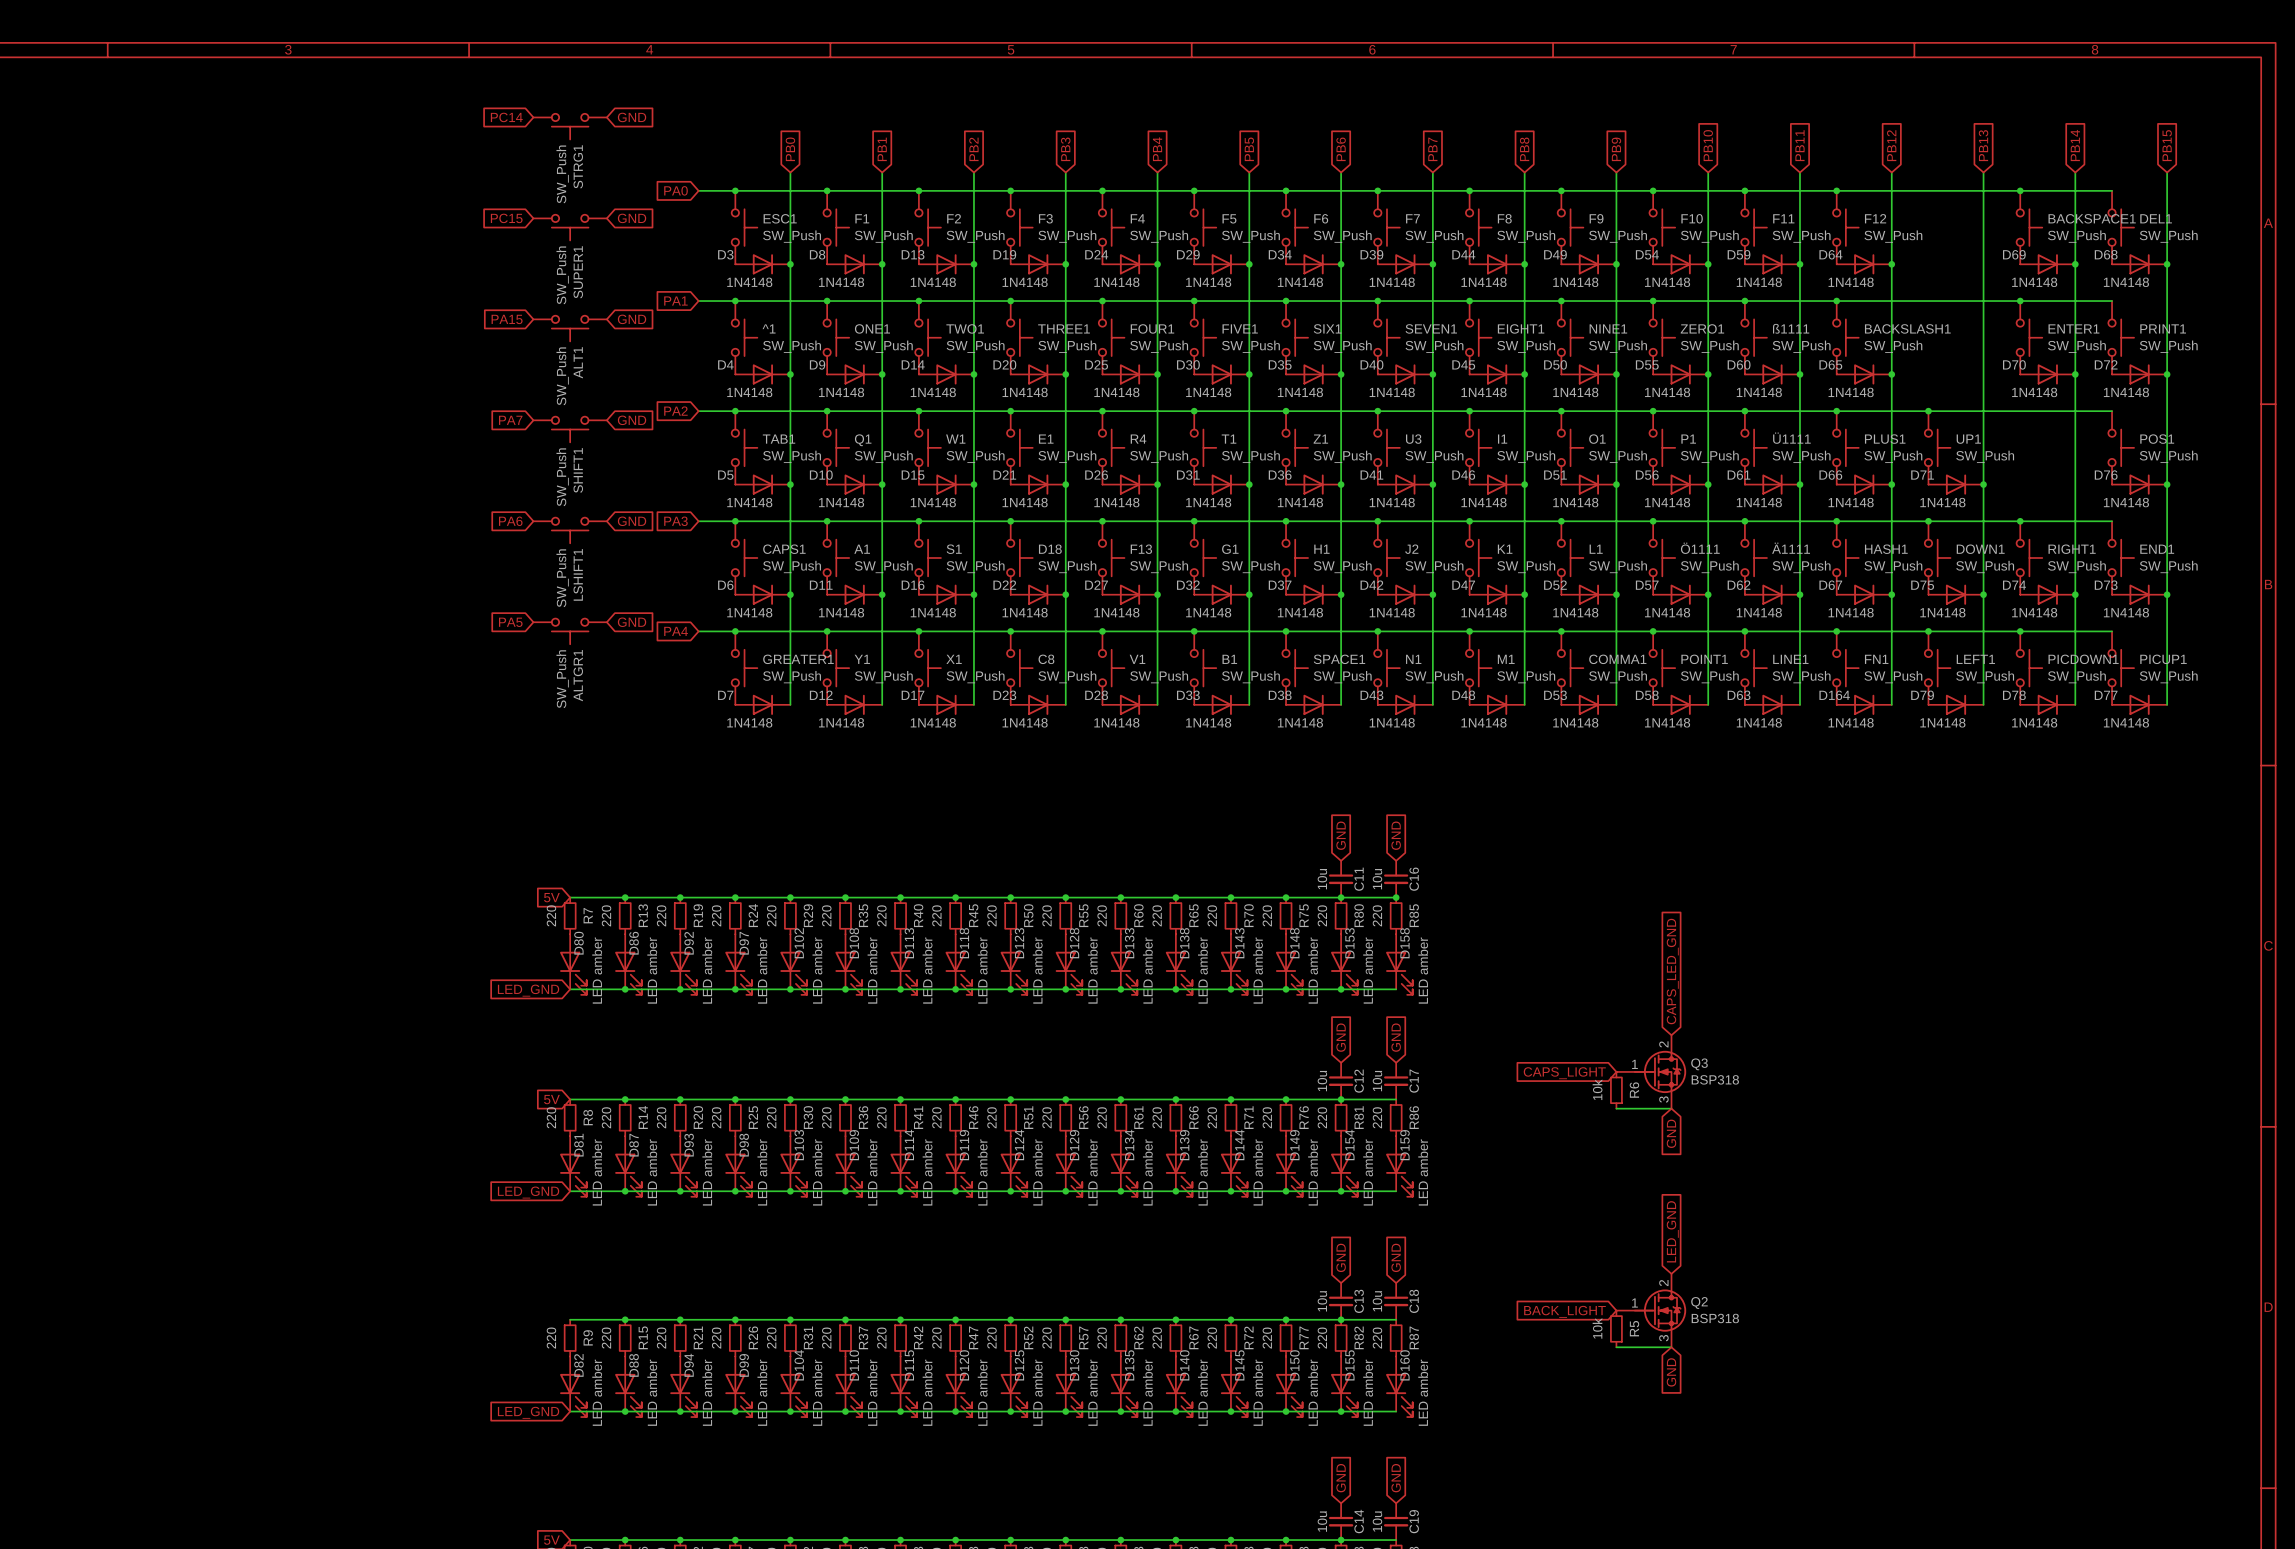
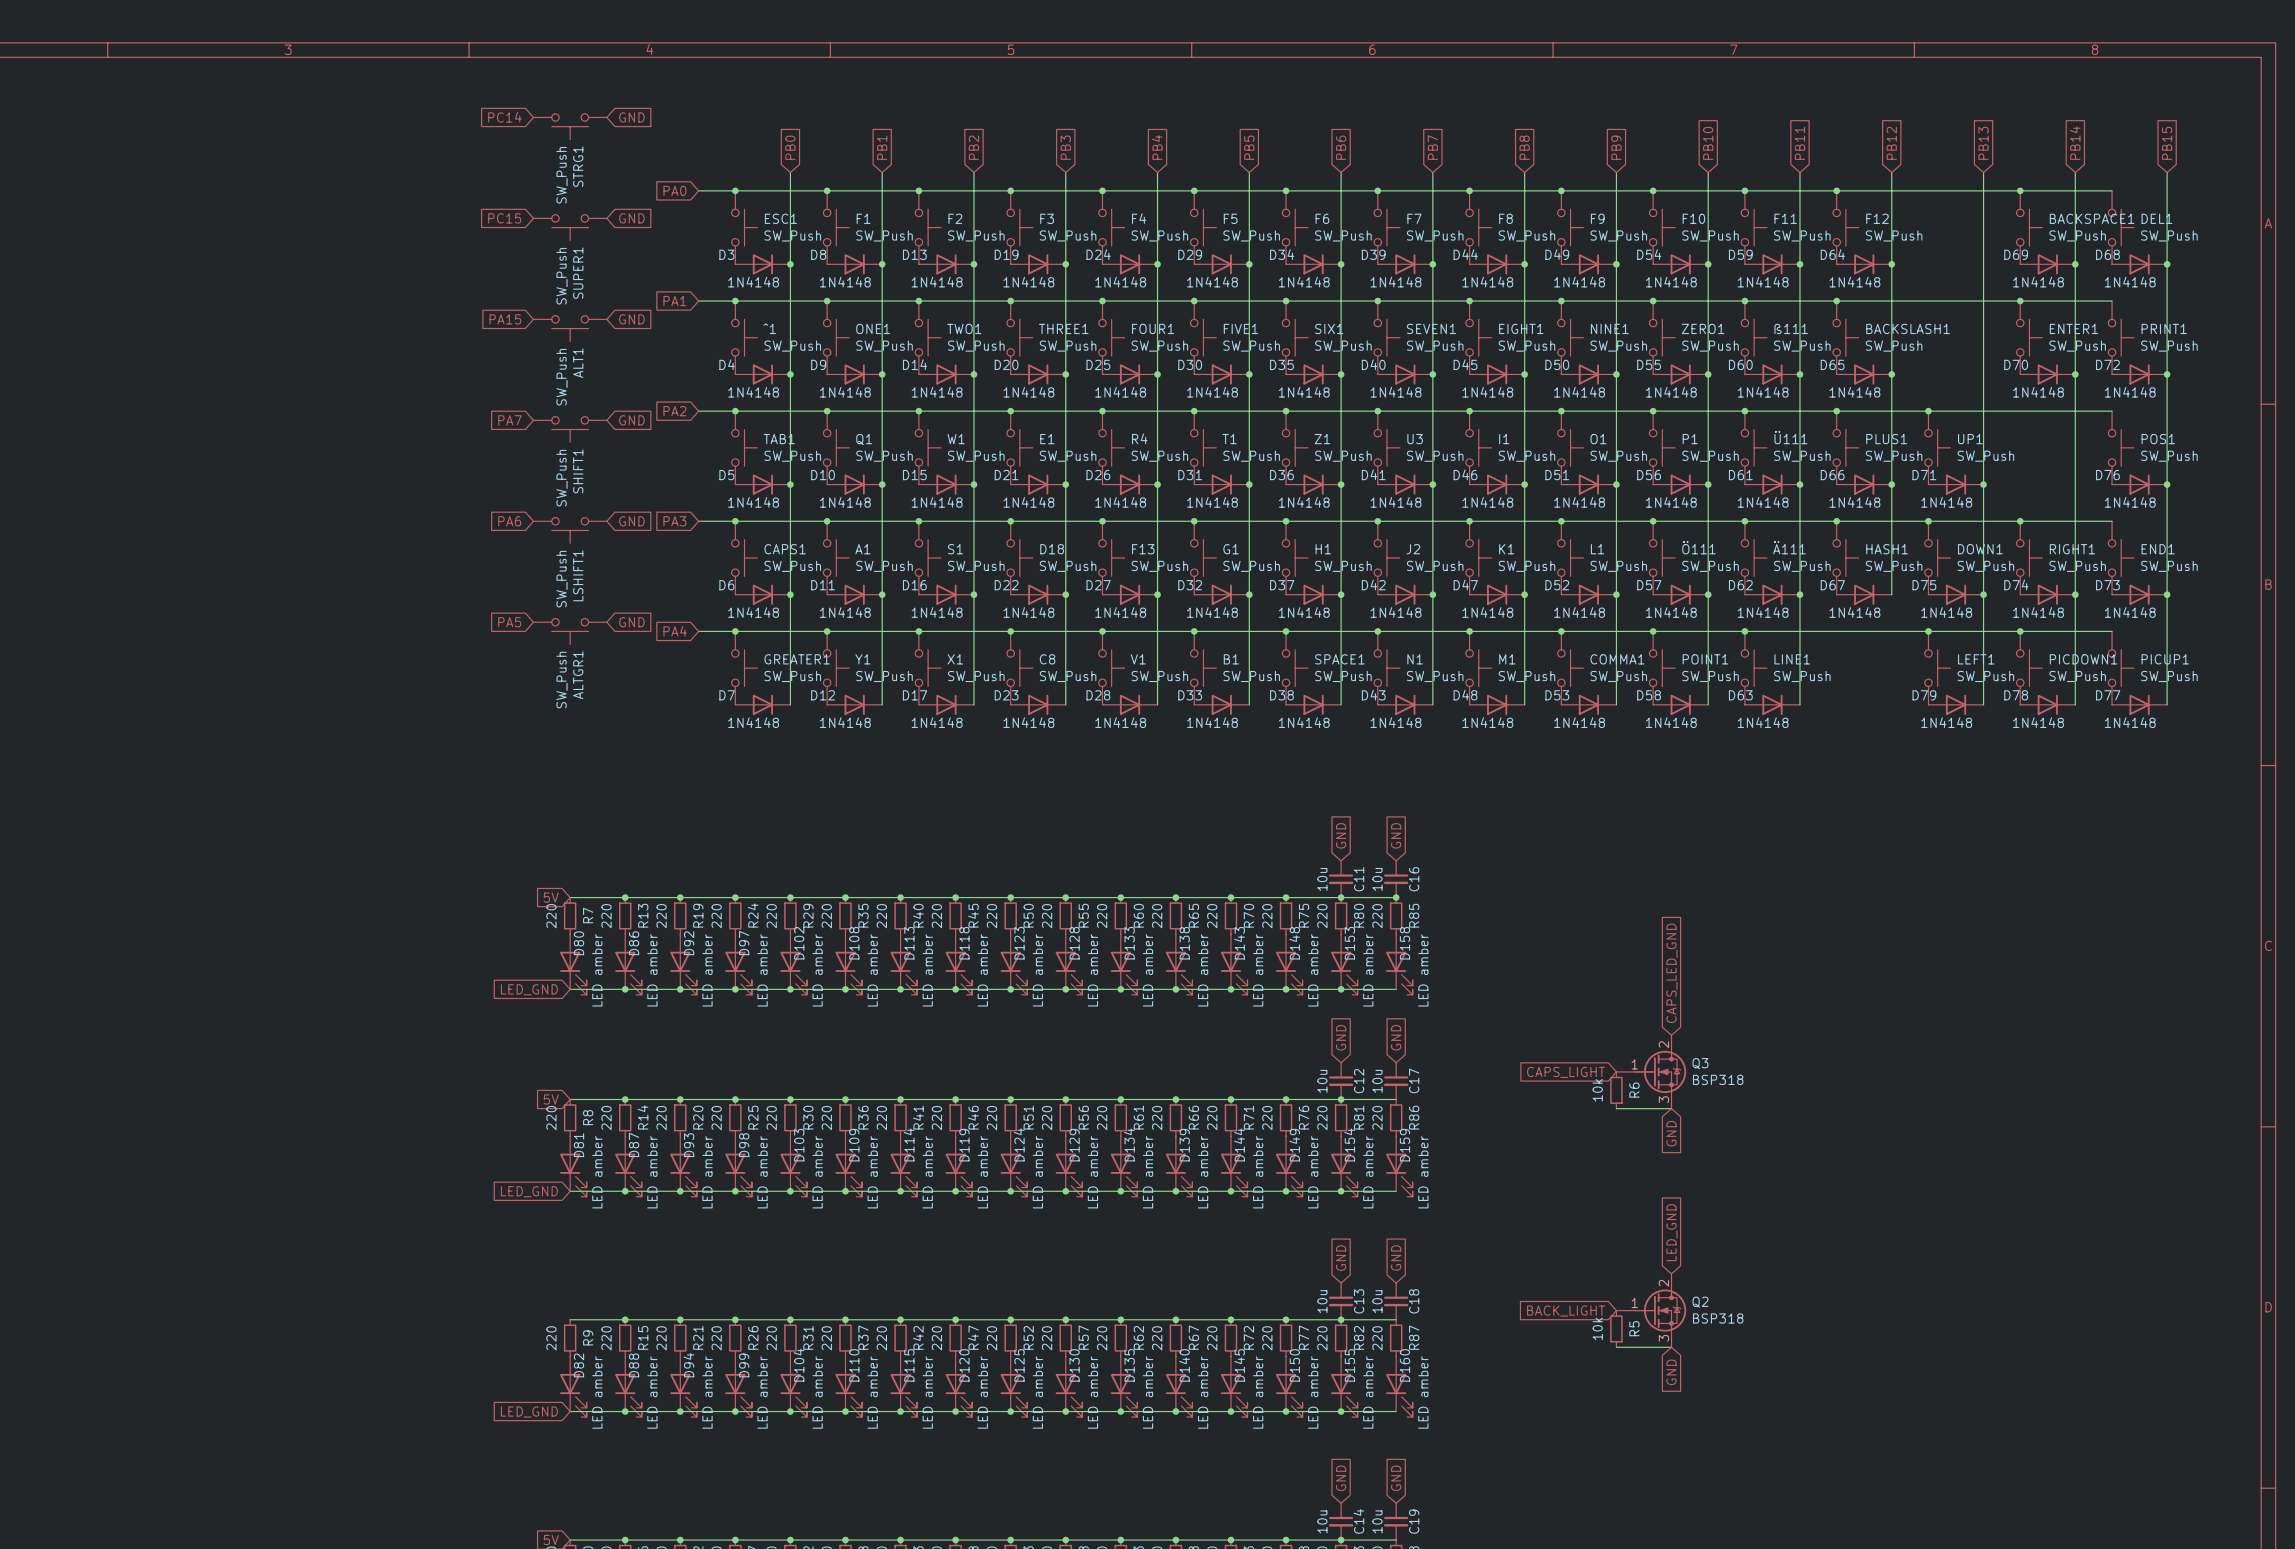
ß1111 name: ß1111 (1791, 328) -> ß111 (1791, 328)
Ü1111 name: Ü1111 (1791, 438) -> Ü111 (1790, 437)
Ö1111 name: Ö1111 (1700, 548) -> Ö111 (1698, 547)
Ä1111 name: Ä1111 (1791, 548) -> Ä111 (1789, 547)
wire: (1891, 594) (1891, 704) -> none
junction: (1891, 594) -> none
junction: (1836, 631) -> none
FN1: SW_Push (1845, 668) -> none
D164: 1N4148 (1864, 704) -> none

